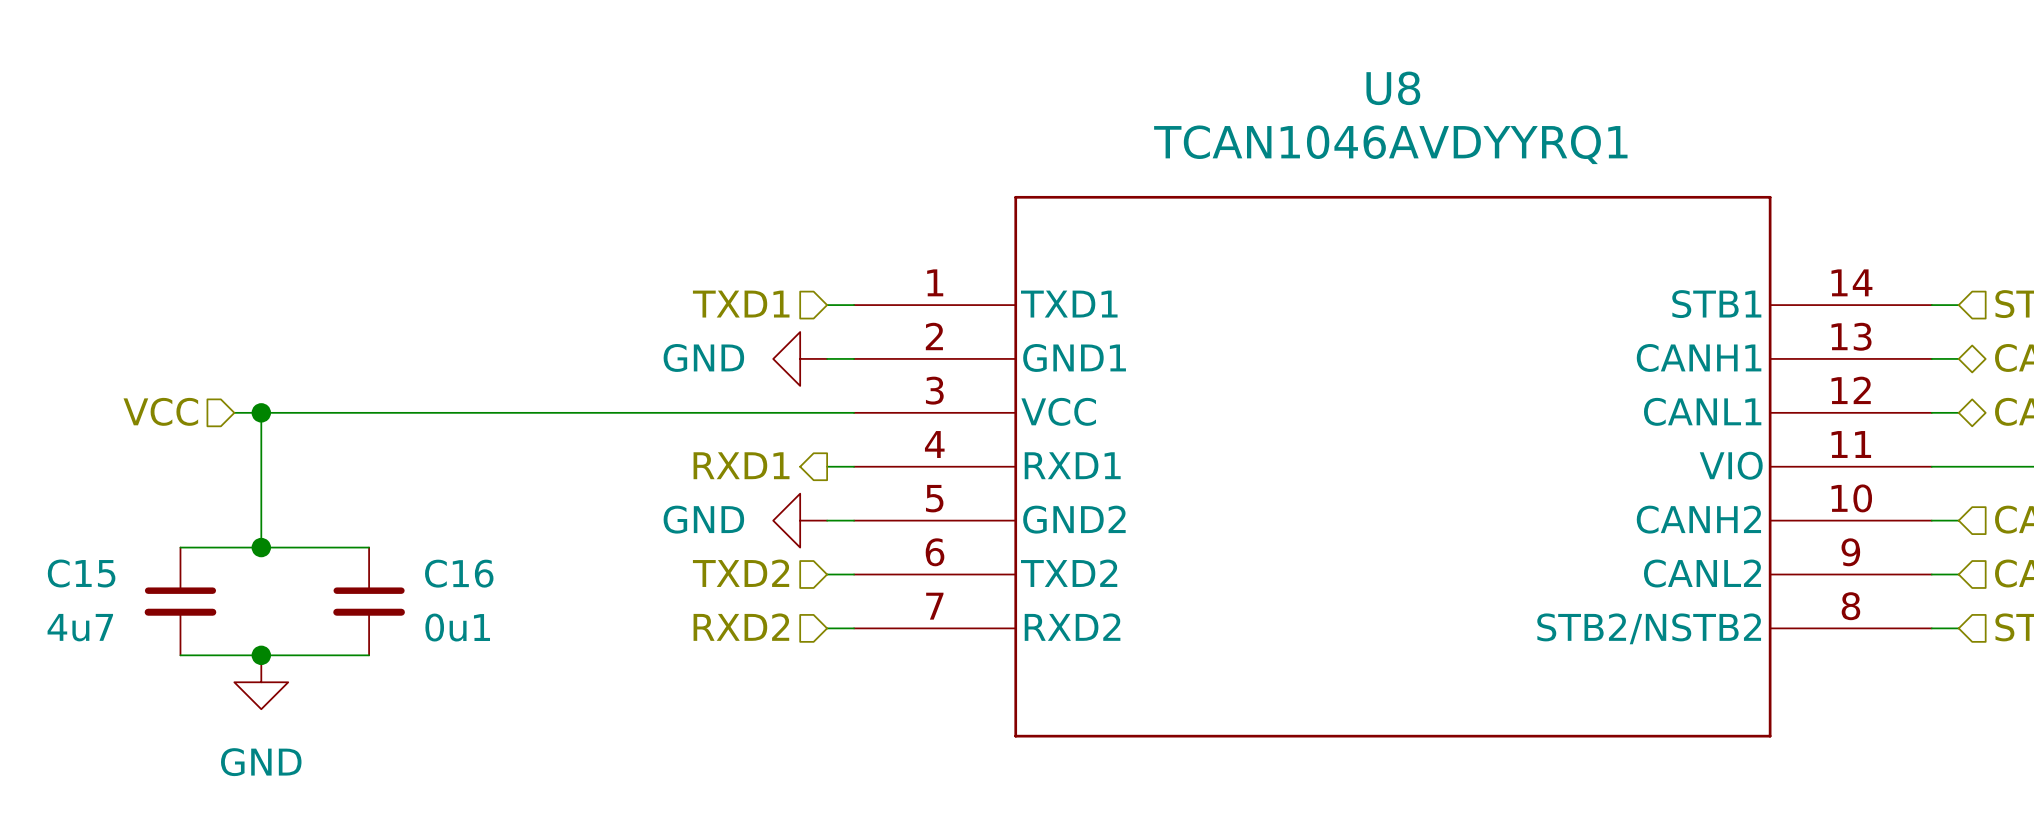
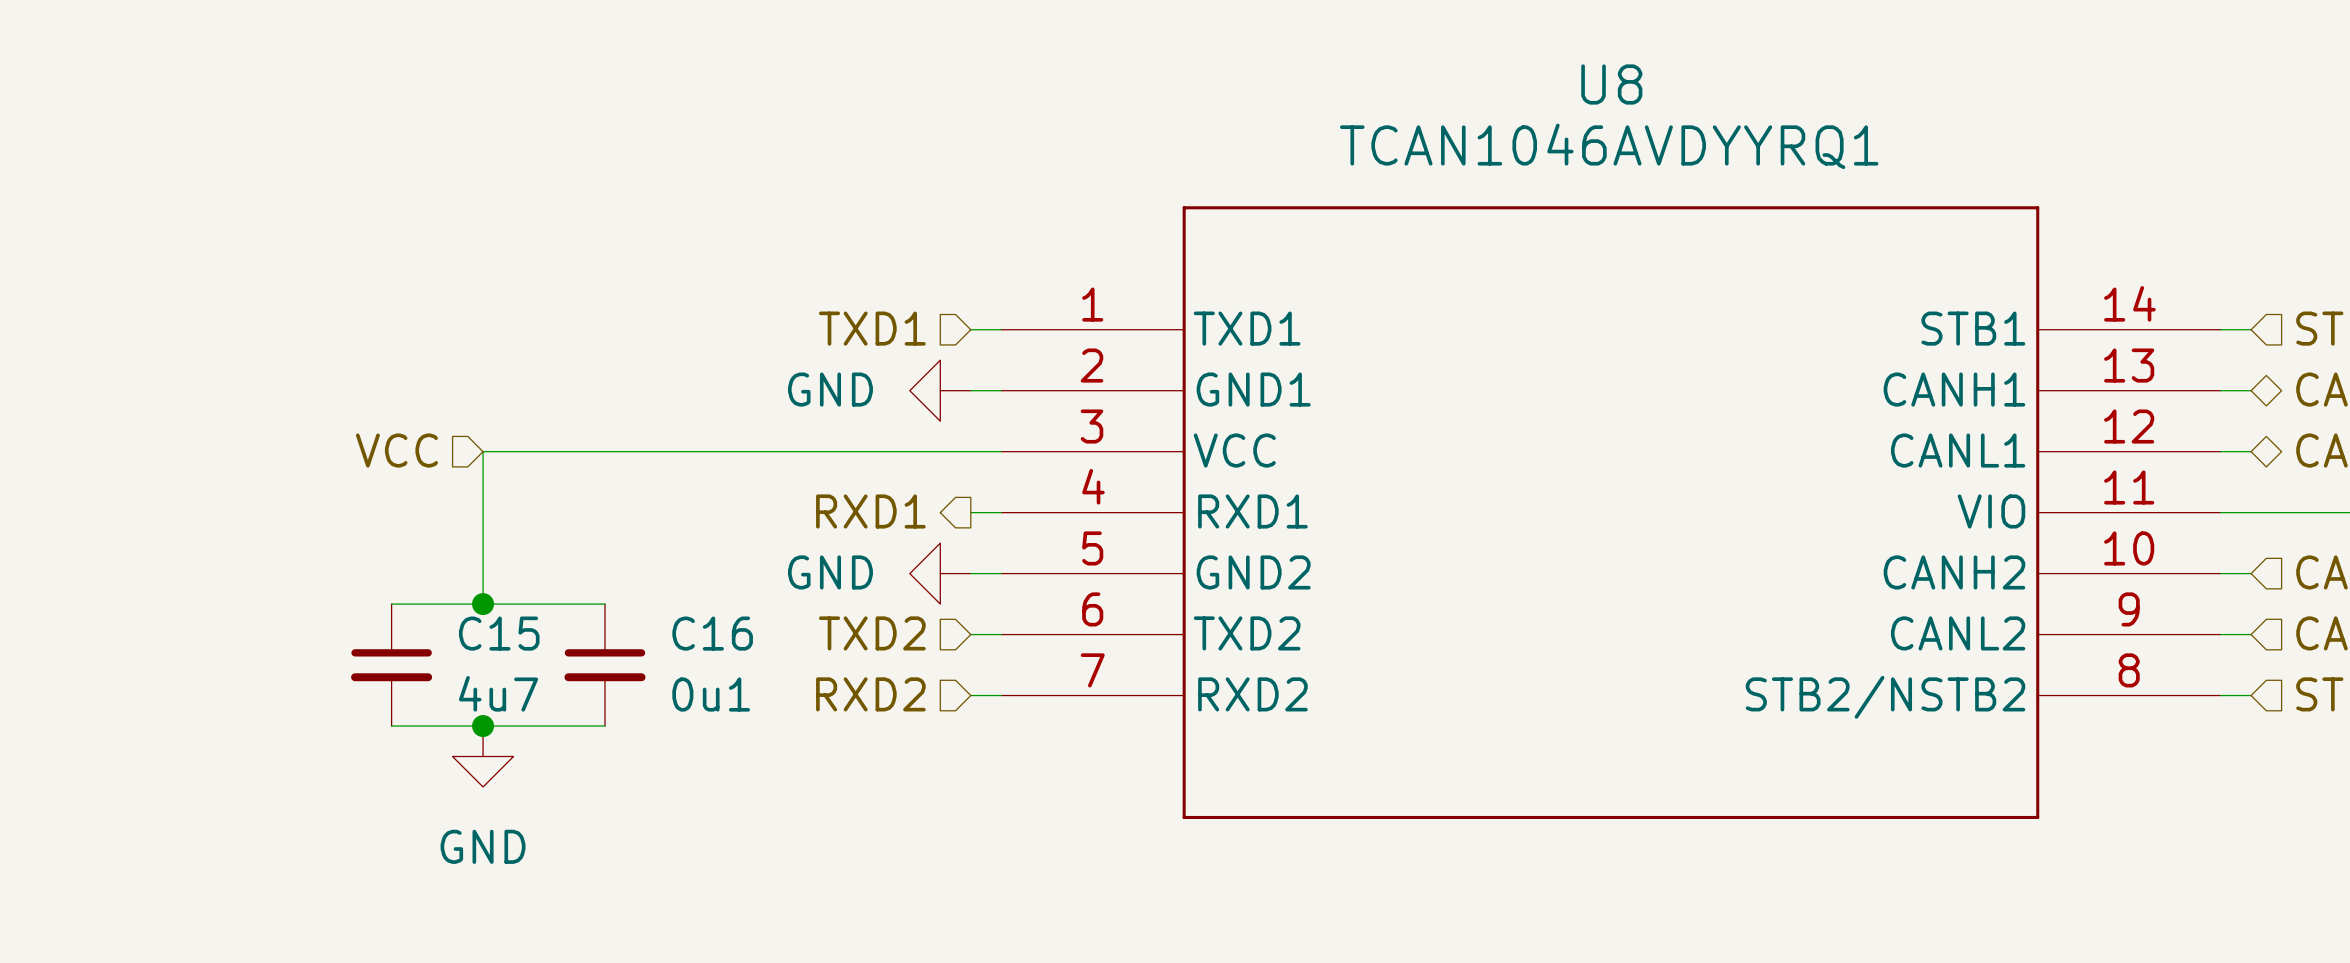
hierarchical label position: VCC (160, 411) -> VCC (396, 450)
wire: (234, 412) (396, 412) -> (483, 604) (483, 451)
wire: (261, 412) (261, 547) -> none
junction: (261, 412) -> none
wire: (180, 547) (315, 547) -> (452, 604) (604, 604)
junction: (261, 547) -> none
junction: none -> (483, 604)
C15 name position: C15 (81, 573) -> C15 (499, 633)
C15 position: (180, 601) -> (391, 665)
C16 position: (369, 601) -> (604, 665)
C15 value position: 4u7 (80, 627) -> 4u7 (498, 693)
wire: (180, 655) (315, 655) -> (452, 726) (604, 726)
junction: (261, 655) -> none
junction: none -> (483, 726)
power symbol position: GND (261, 682) -> GND (483, 756)

